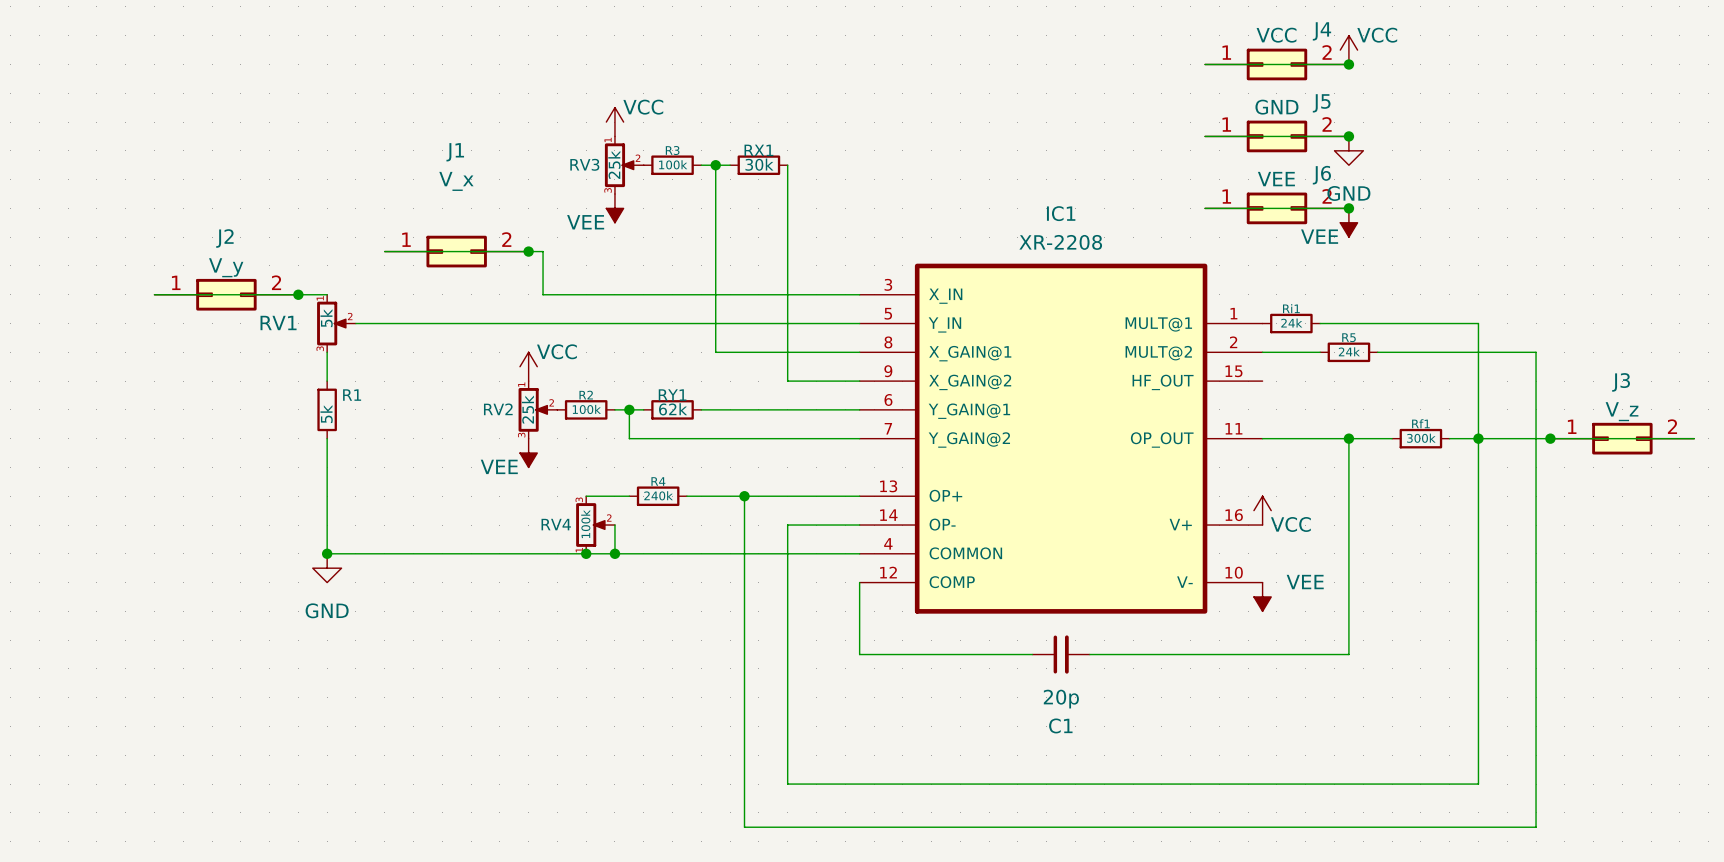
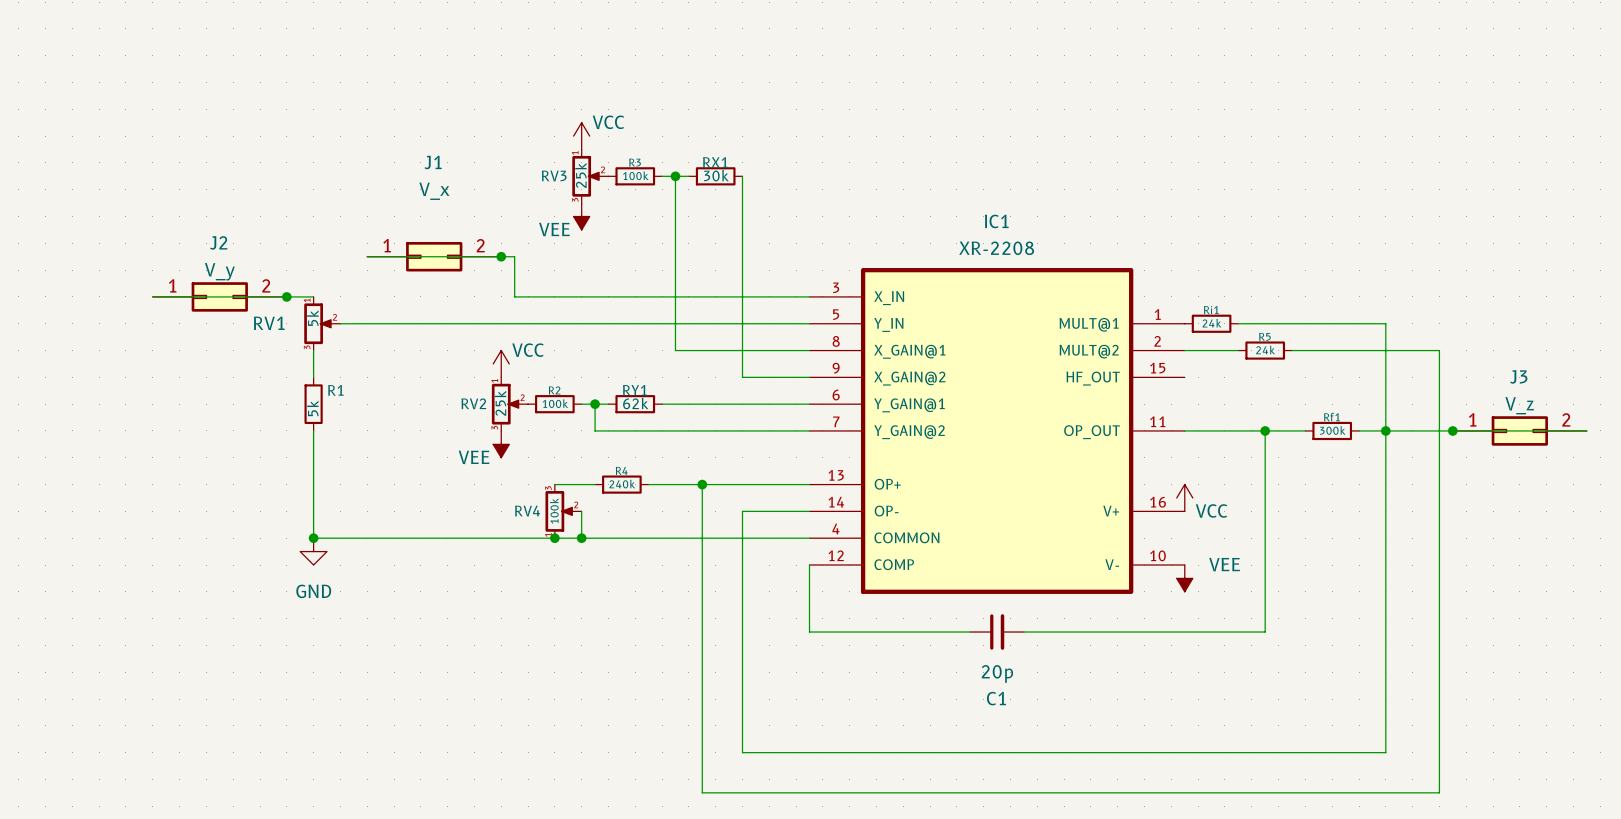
power symbol: VCC (1348, 50) -> none
wire: (1205, 64) (1348, 64) -> none
J4: VCC (1276, 64) -> none
junction: (1348, 64) -> none
wire: (1205, 136) (1348, 136) -> none
J5: GND (1276, 136) -> none
junction: (1348, 136) -> none
power symbol: GND (1348, 150) -> none
wire: (1205, 208) (1348, 208) -> none
J6: VEE (1276, 208) -> none
junction: (1348, 208) -> none
power symbol: VEE (1348, 222) -> none

